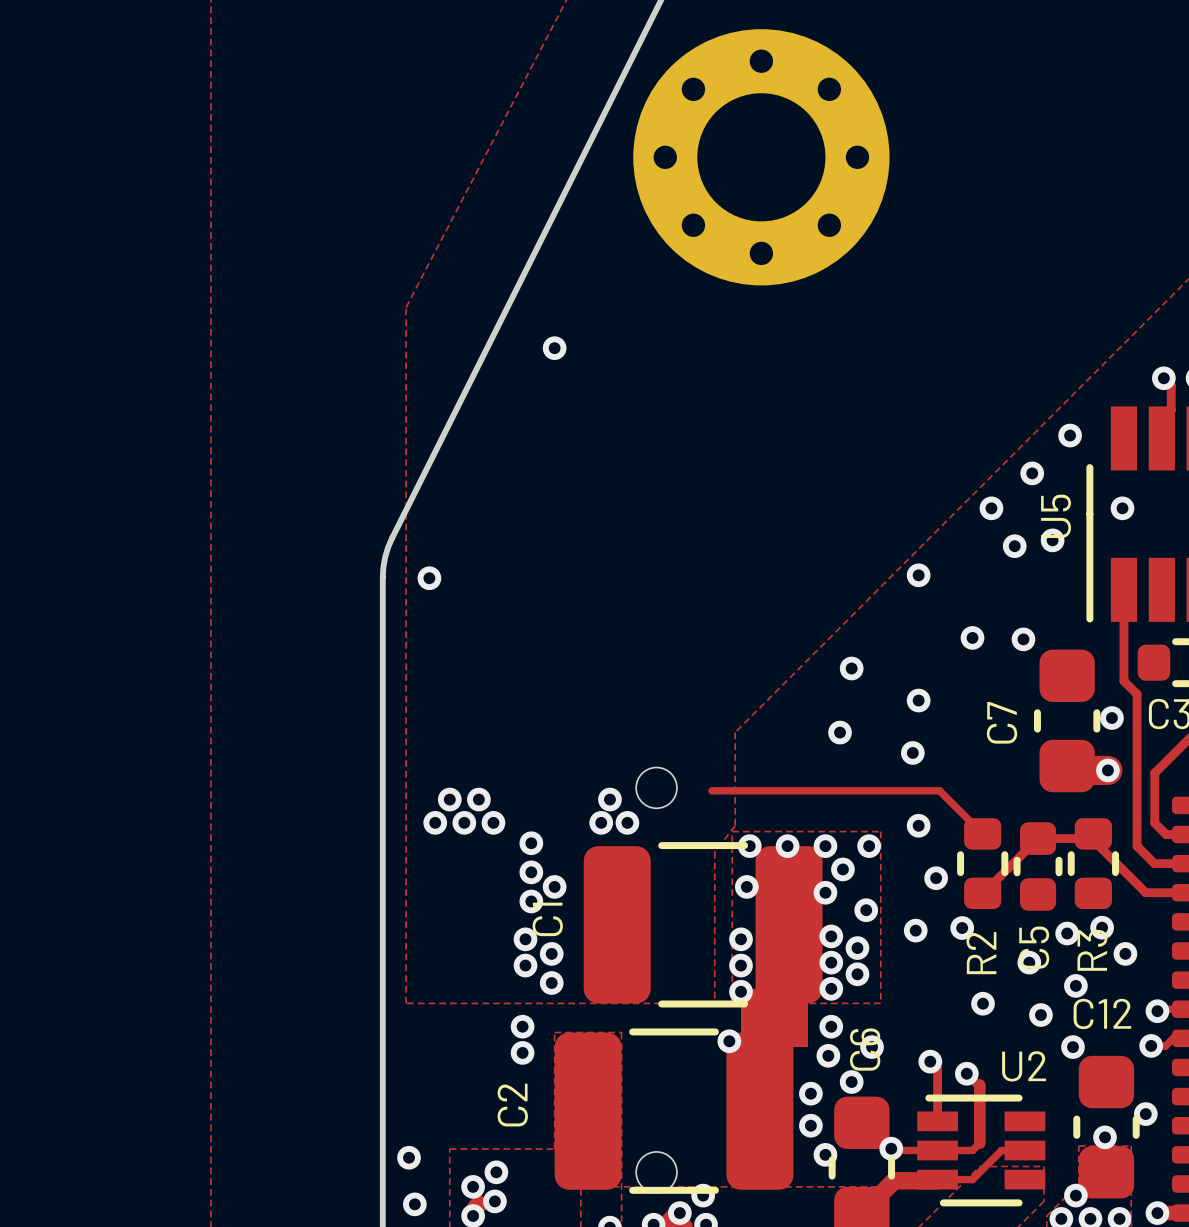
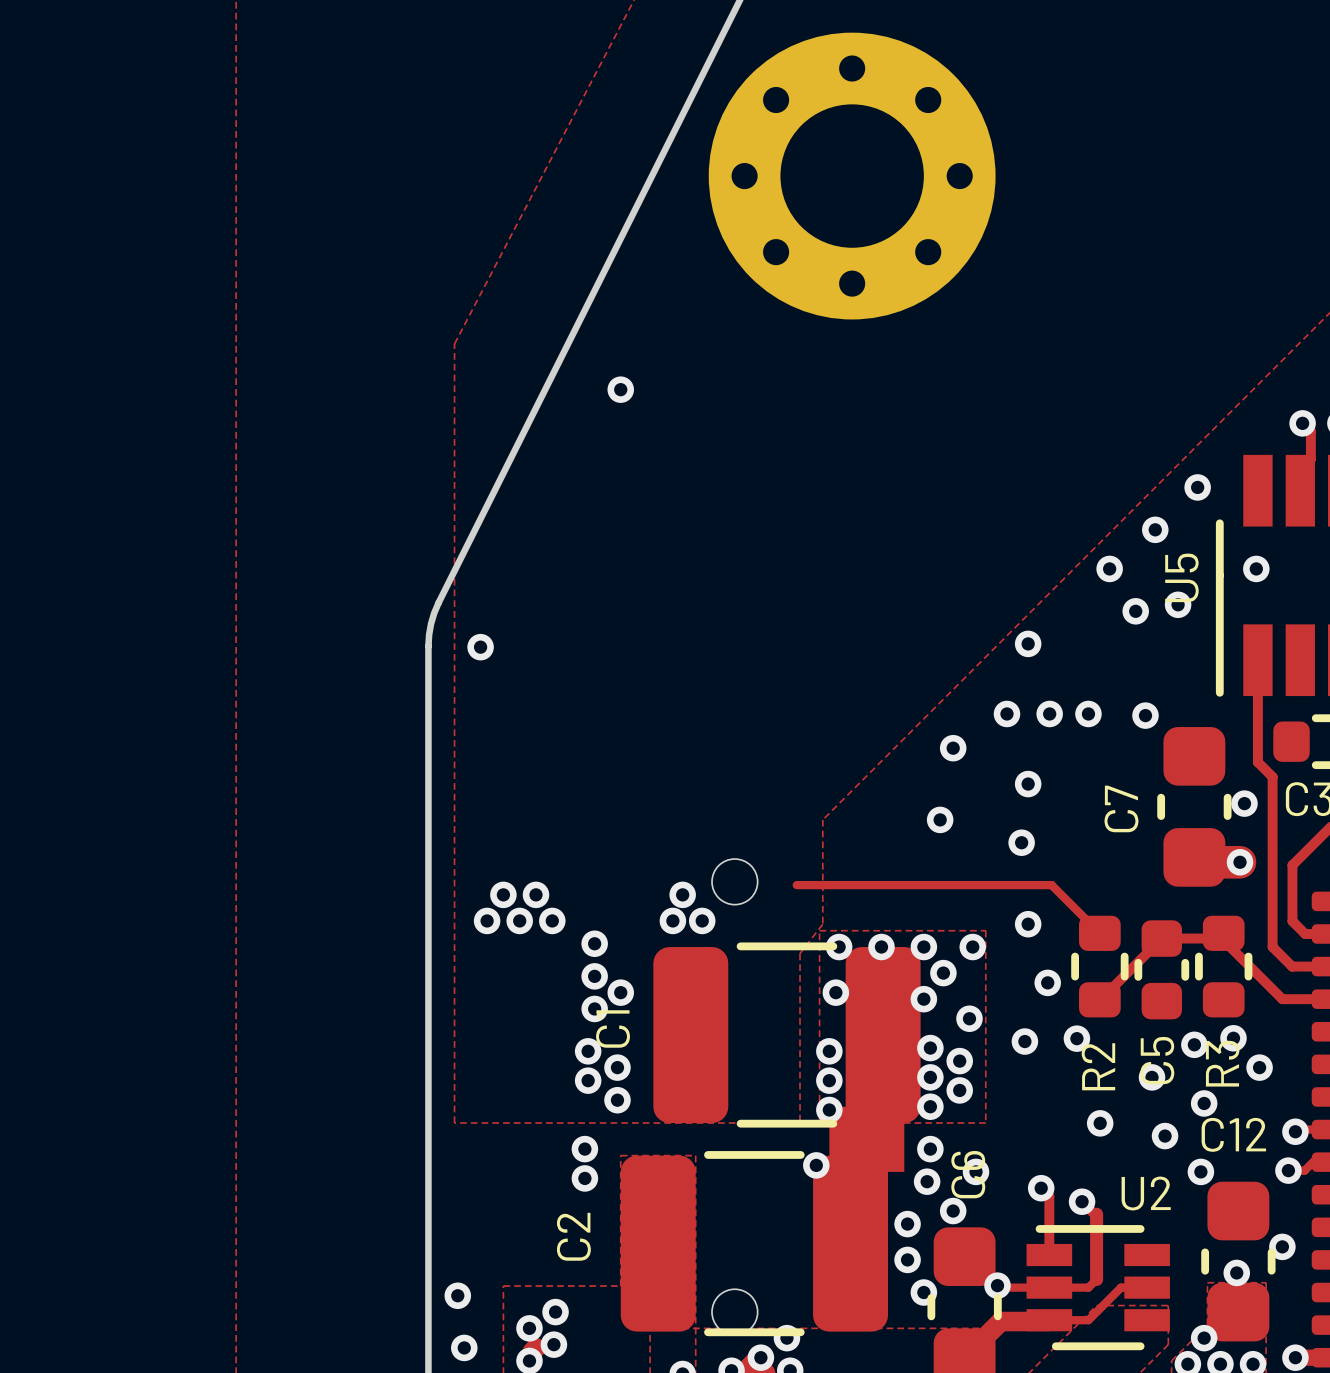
via: none -> (1006, 713)
via: none -> (1049, 713)

